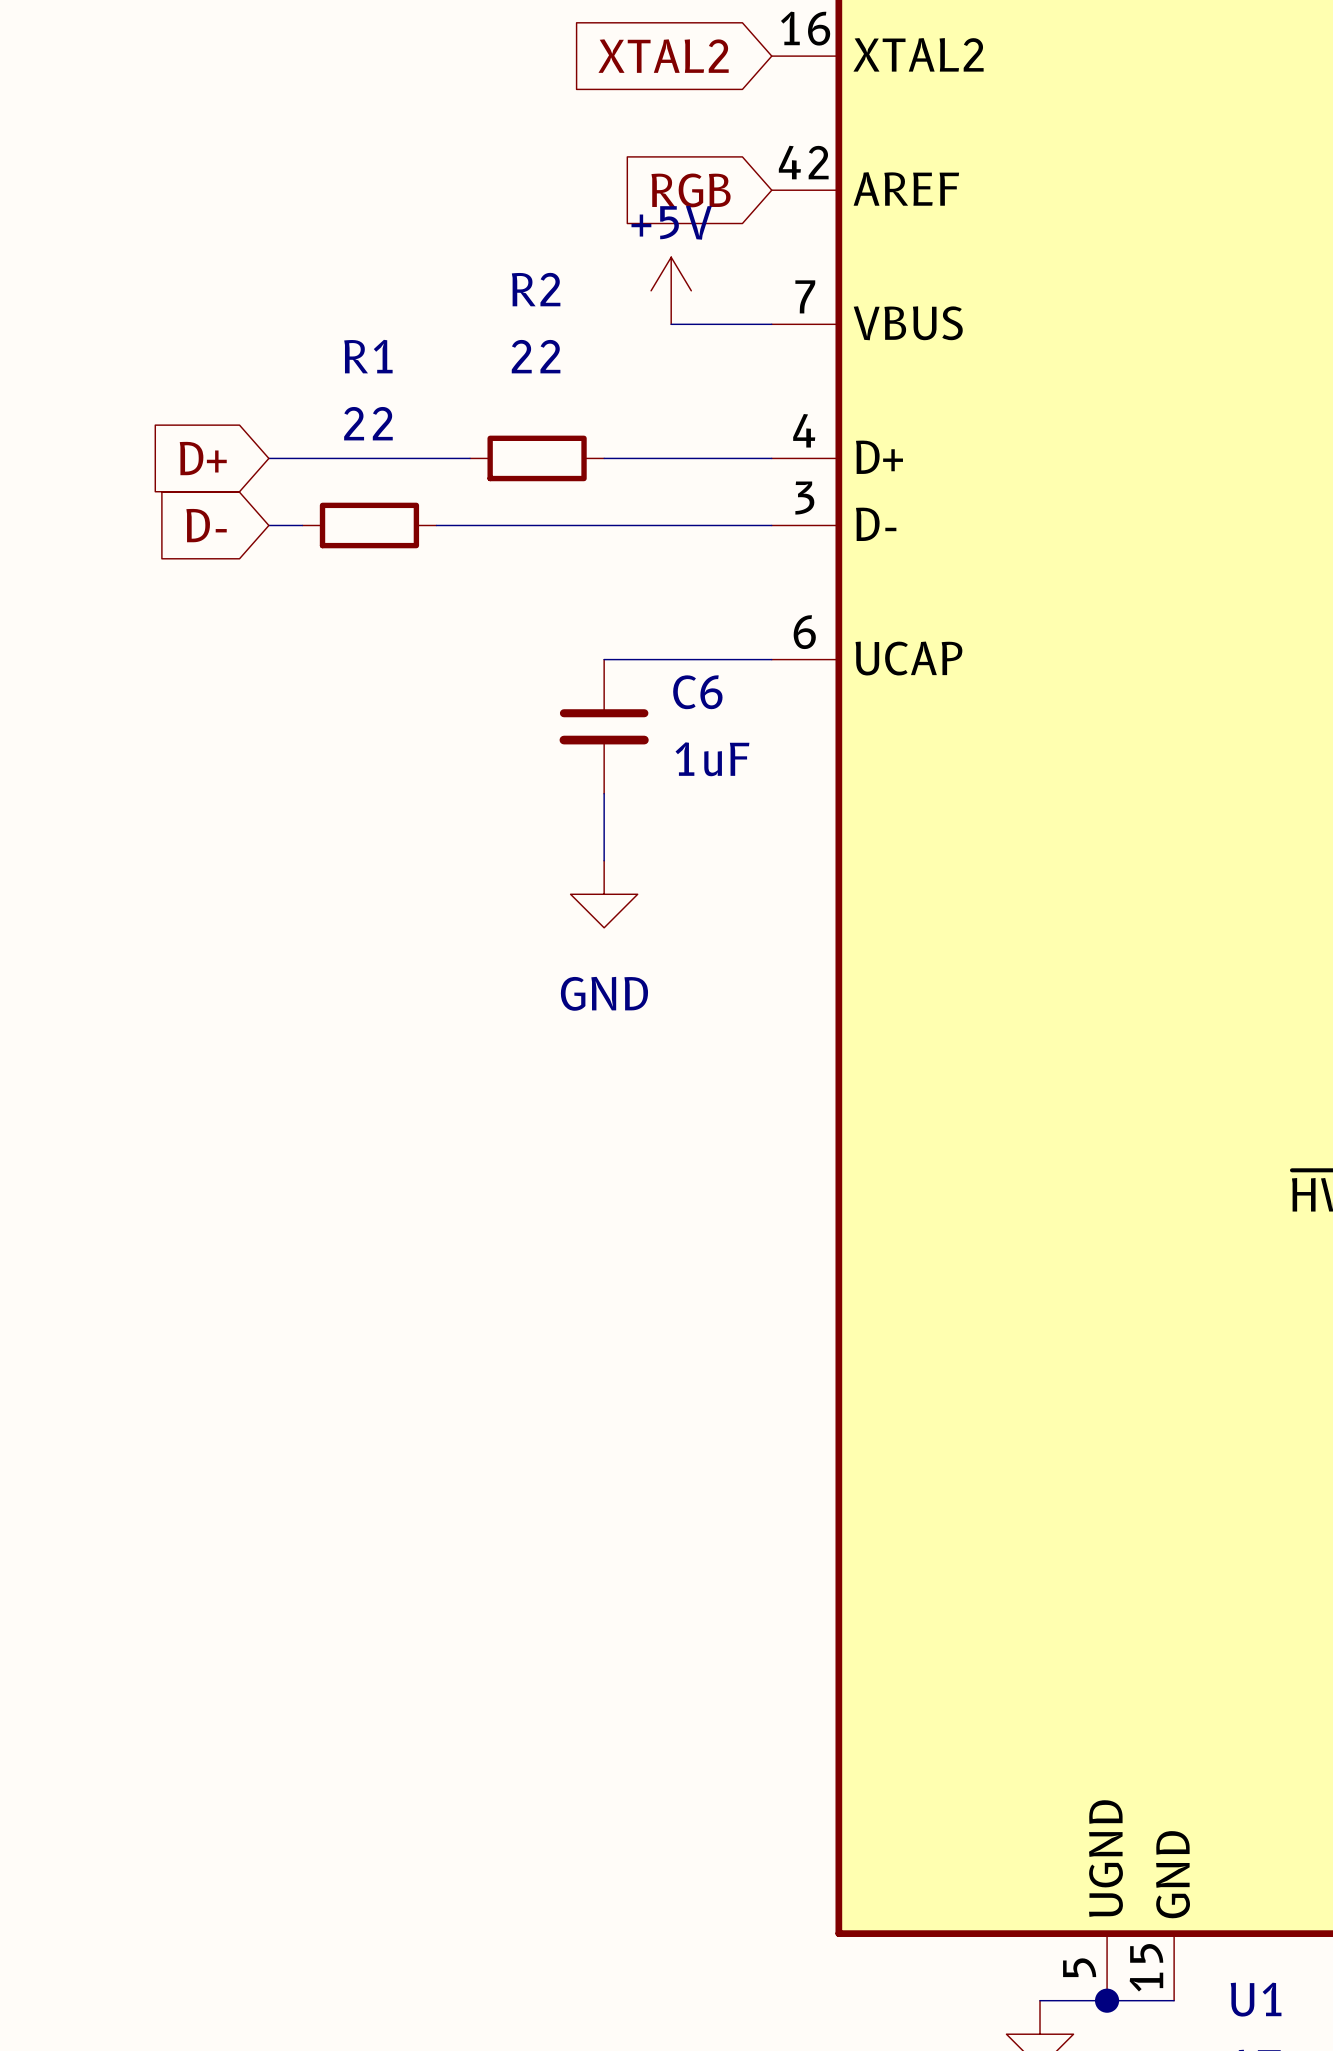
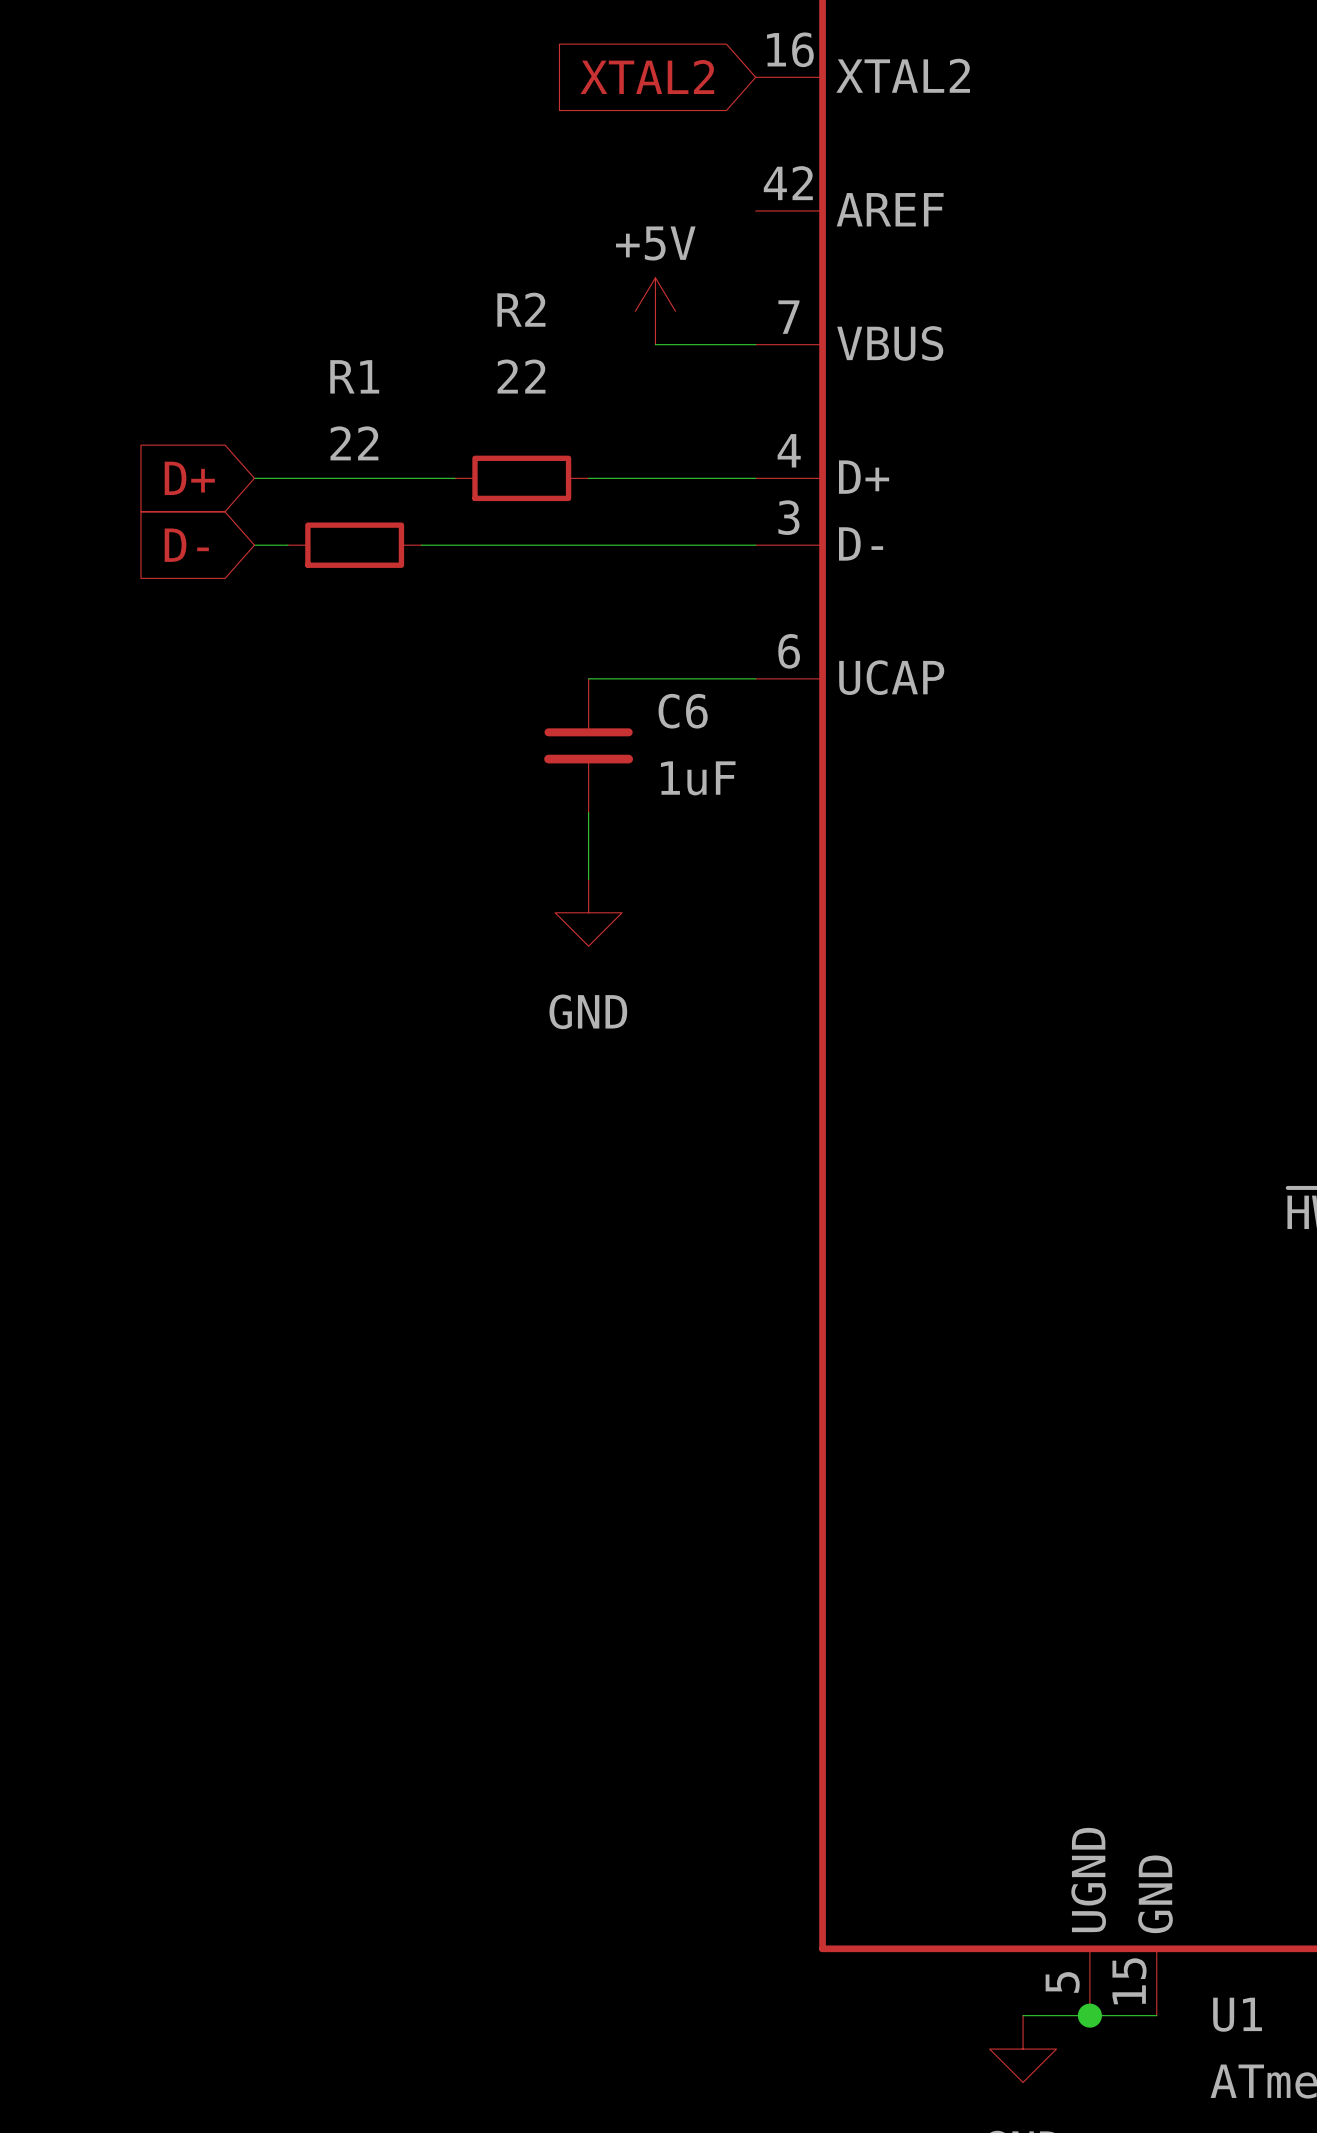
global label: RGB (691, 190) -> none

